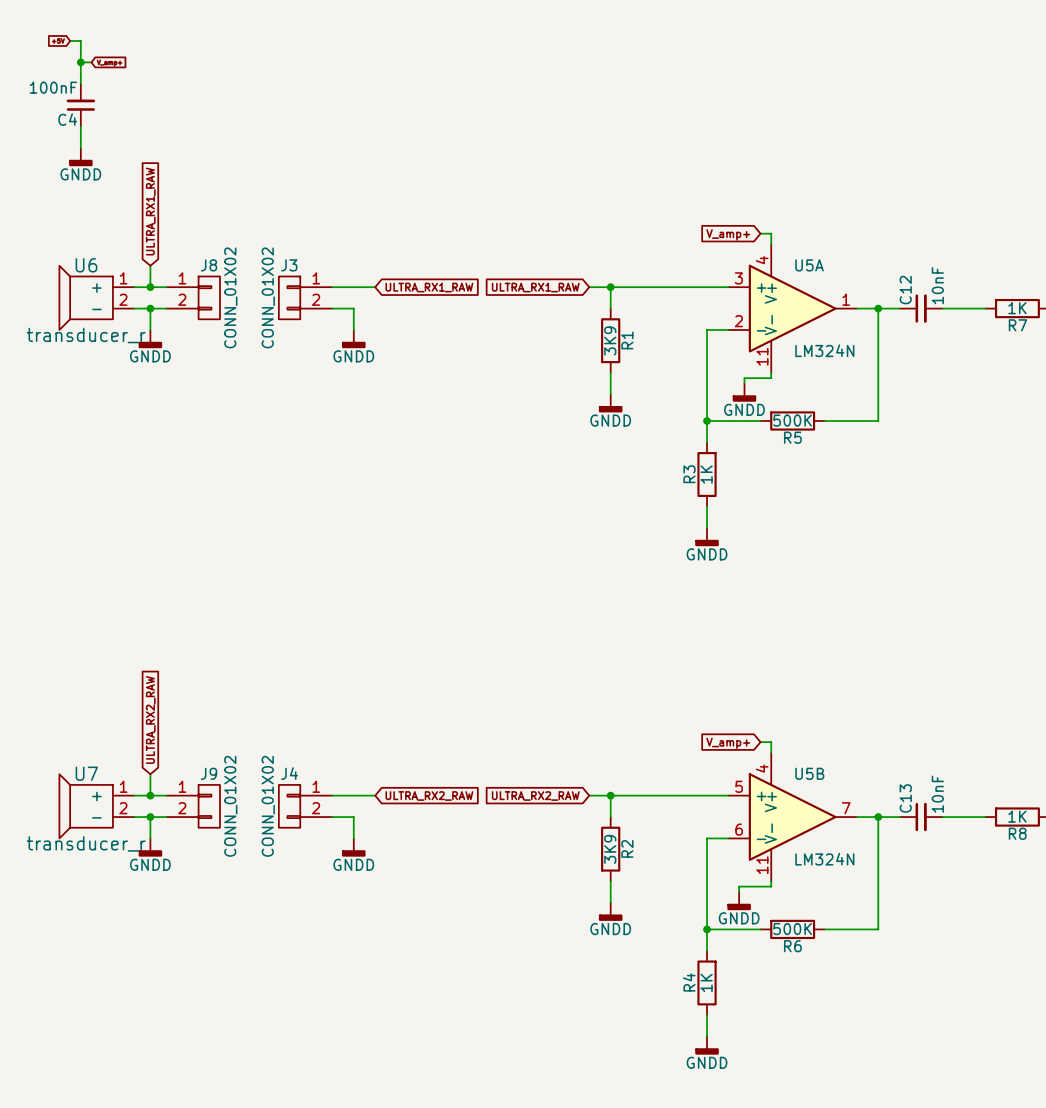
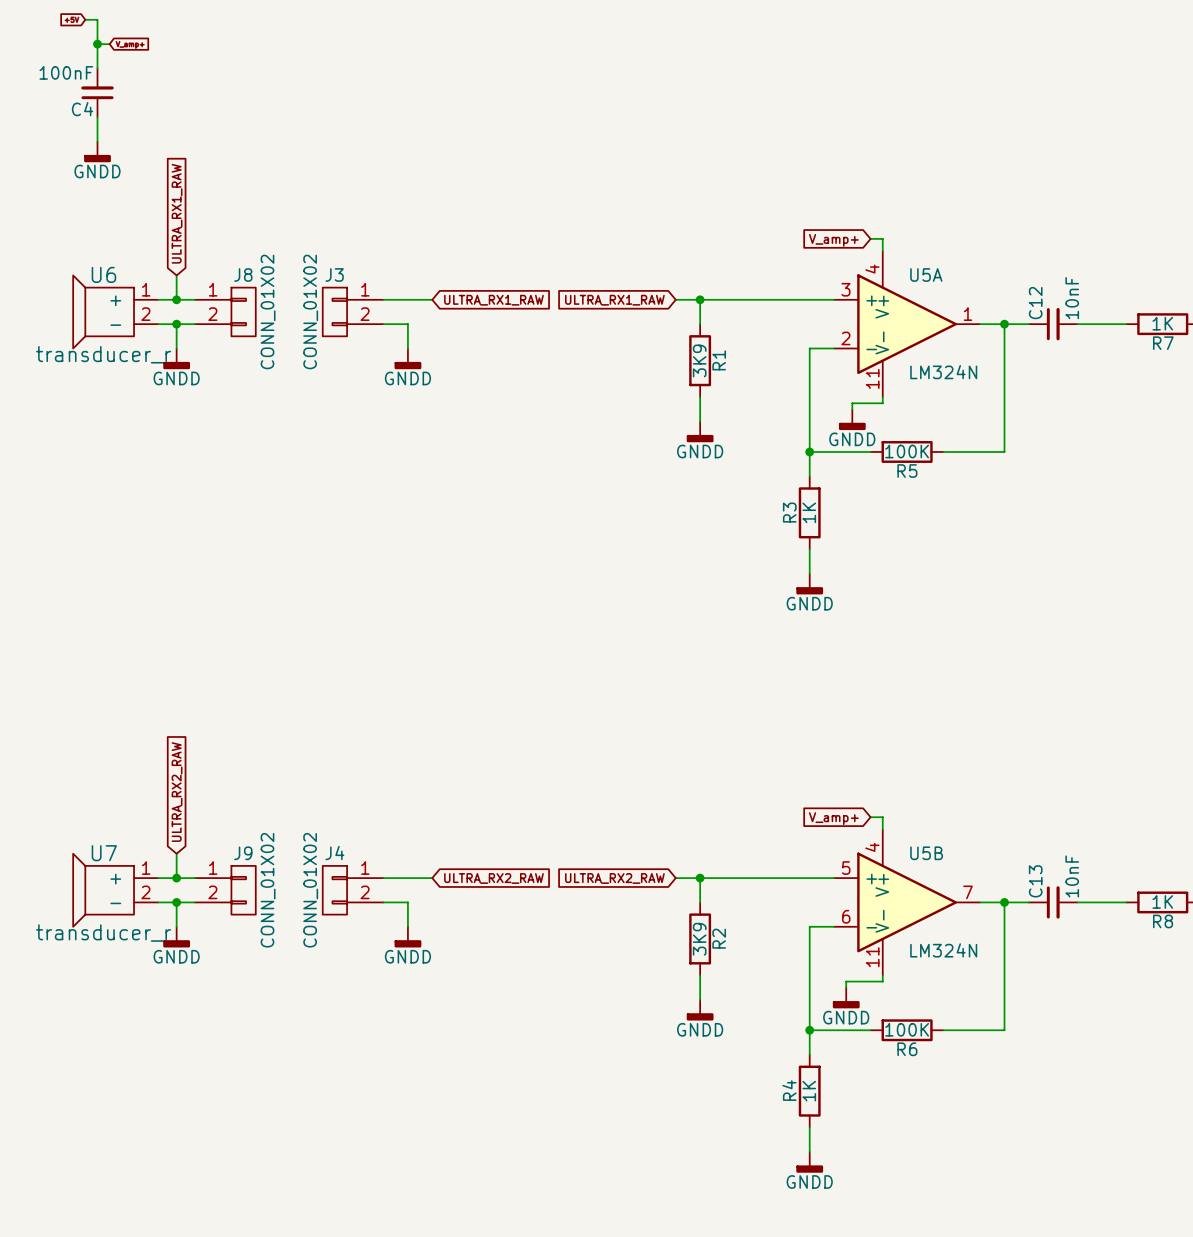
R5 value: 500K (792, 420) -> 100K (907, 451)
R6 value: 500K (792, 929) -> 100K (907, 1029)

